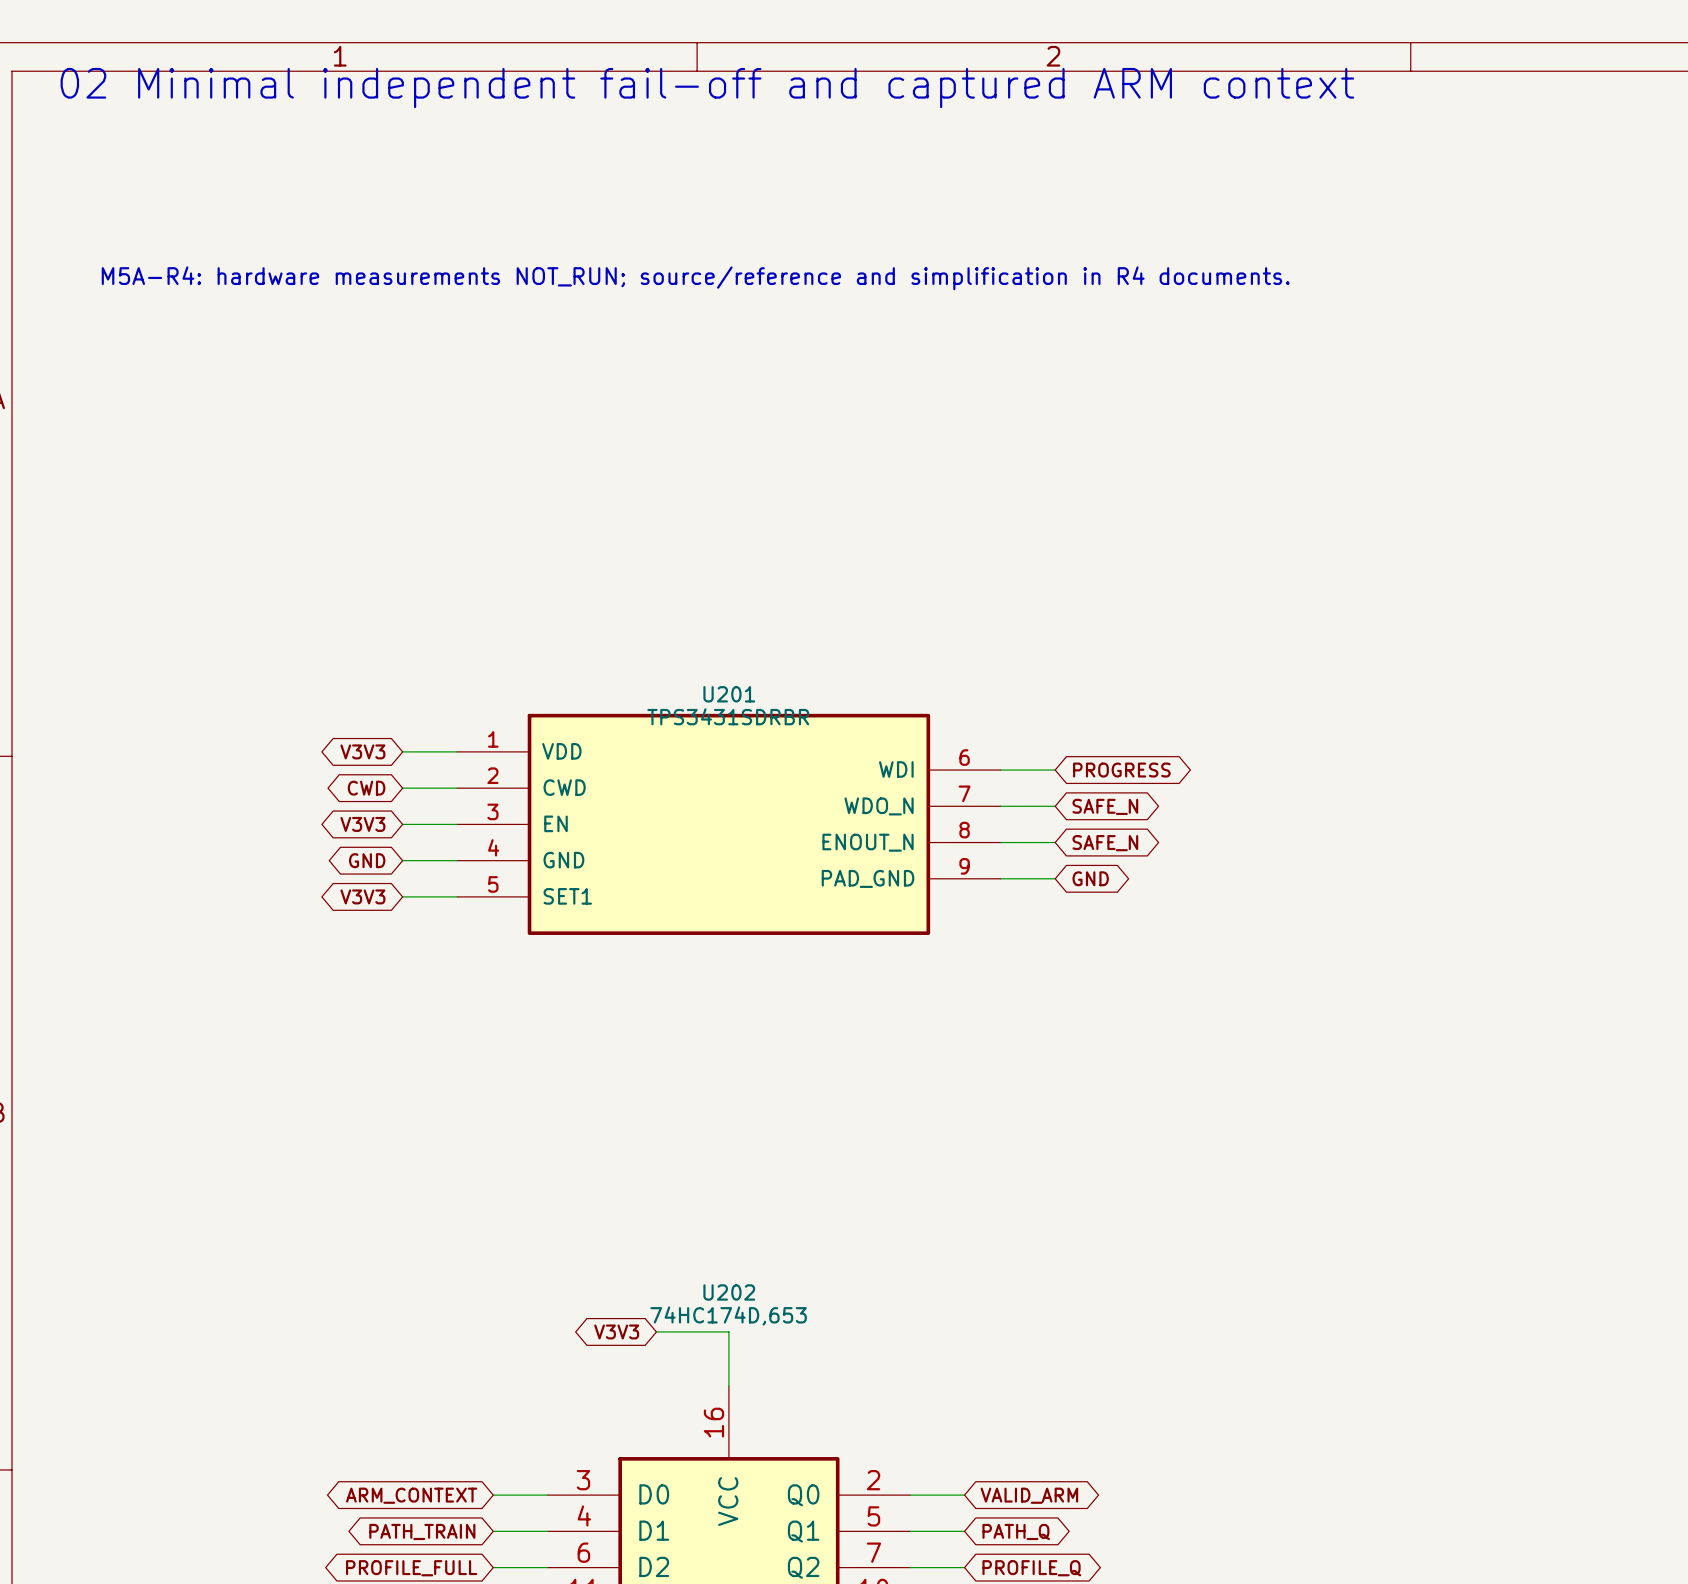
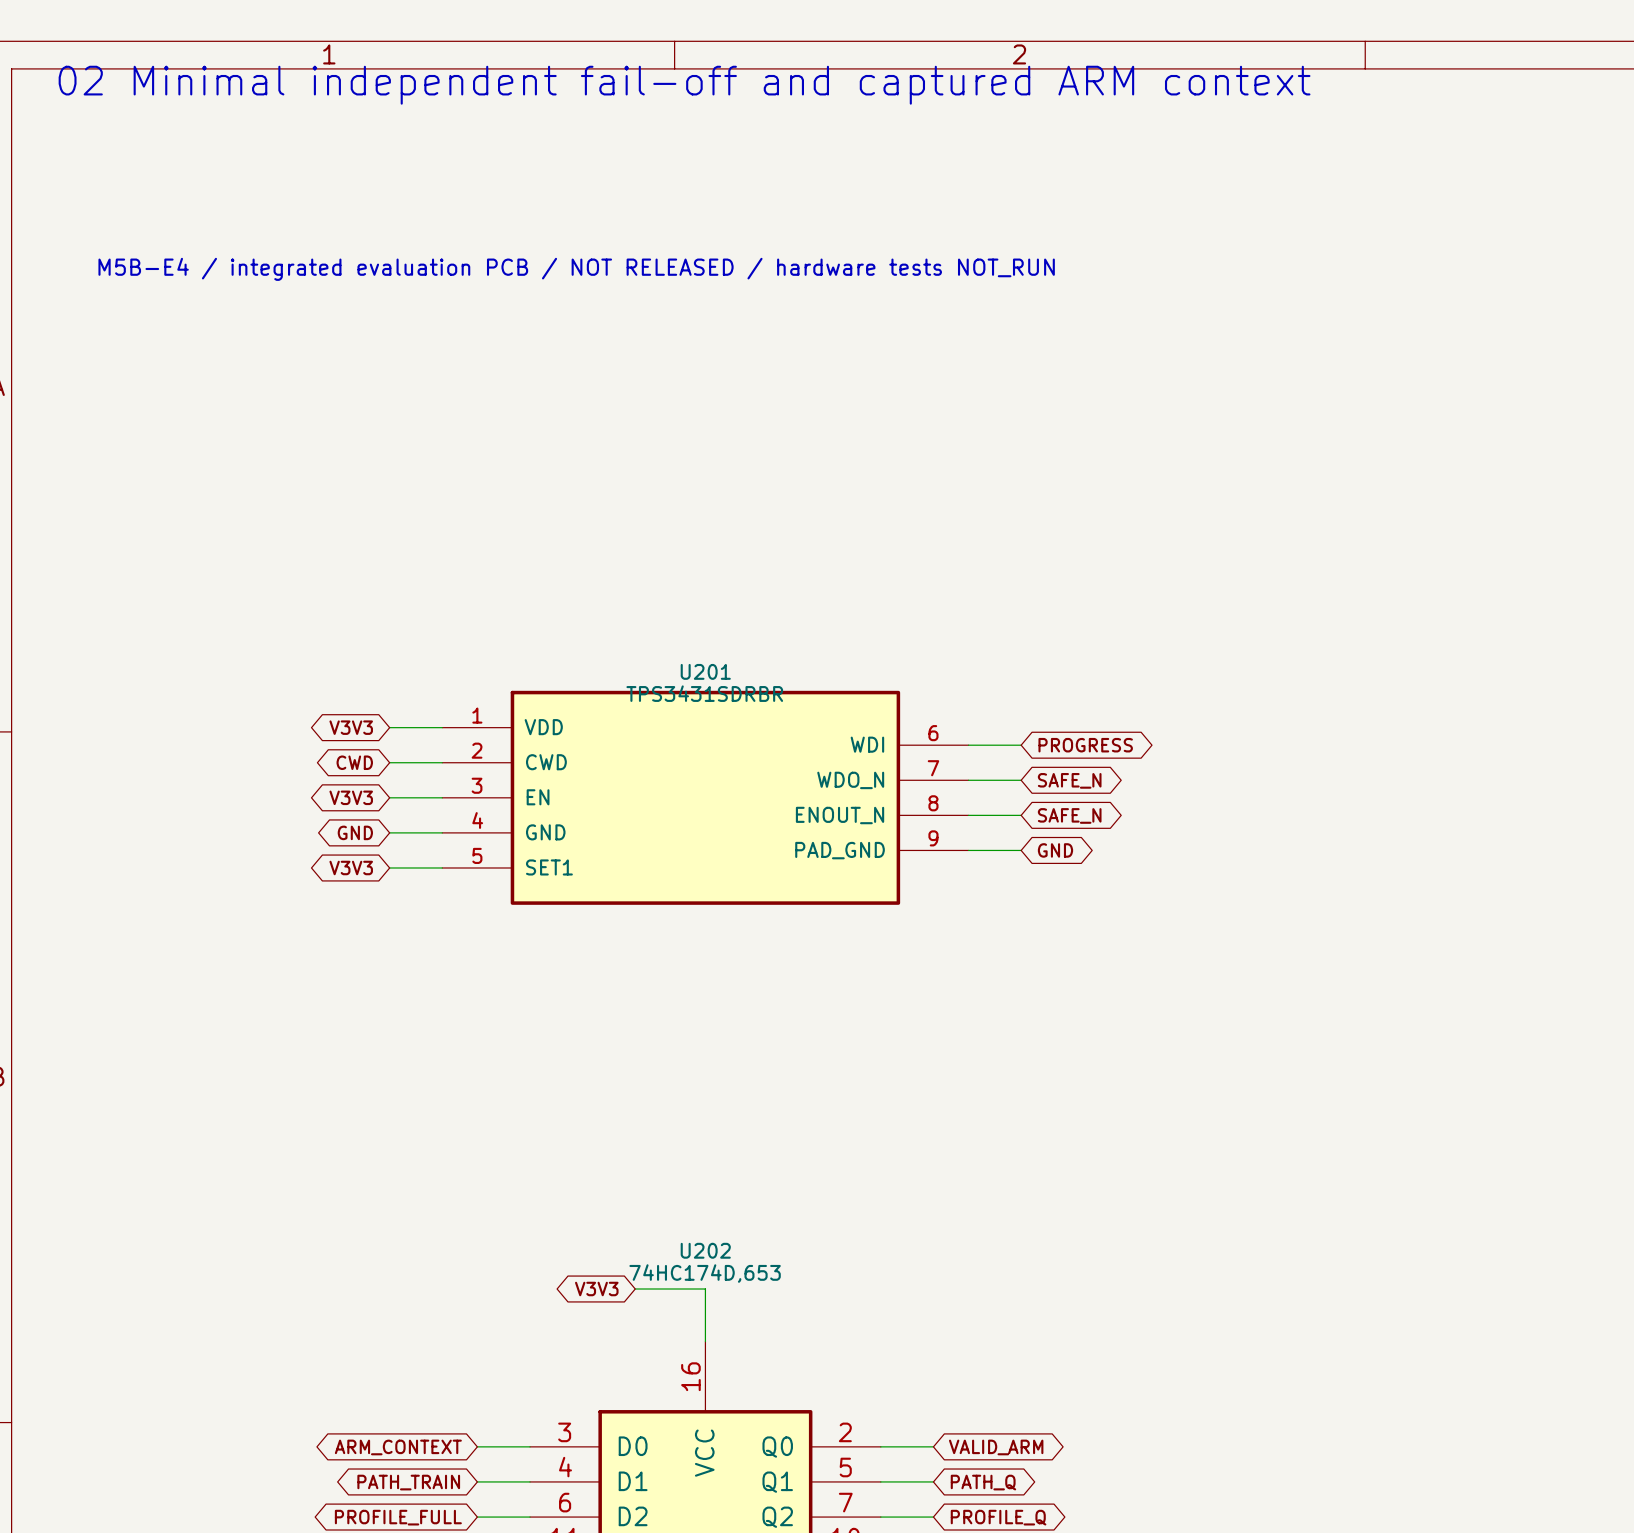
text: M5A-R4: hardware measurements NOT_RUN; source/reference and simplification in R4 documents. (695, 278) -> M5B-E4 / integrated evaluation PCB / NOT RELEASED / hardware tests NOT_RUN (576, 269)

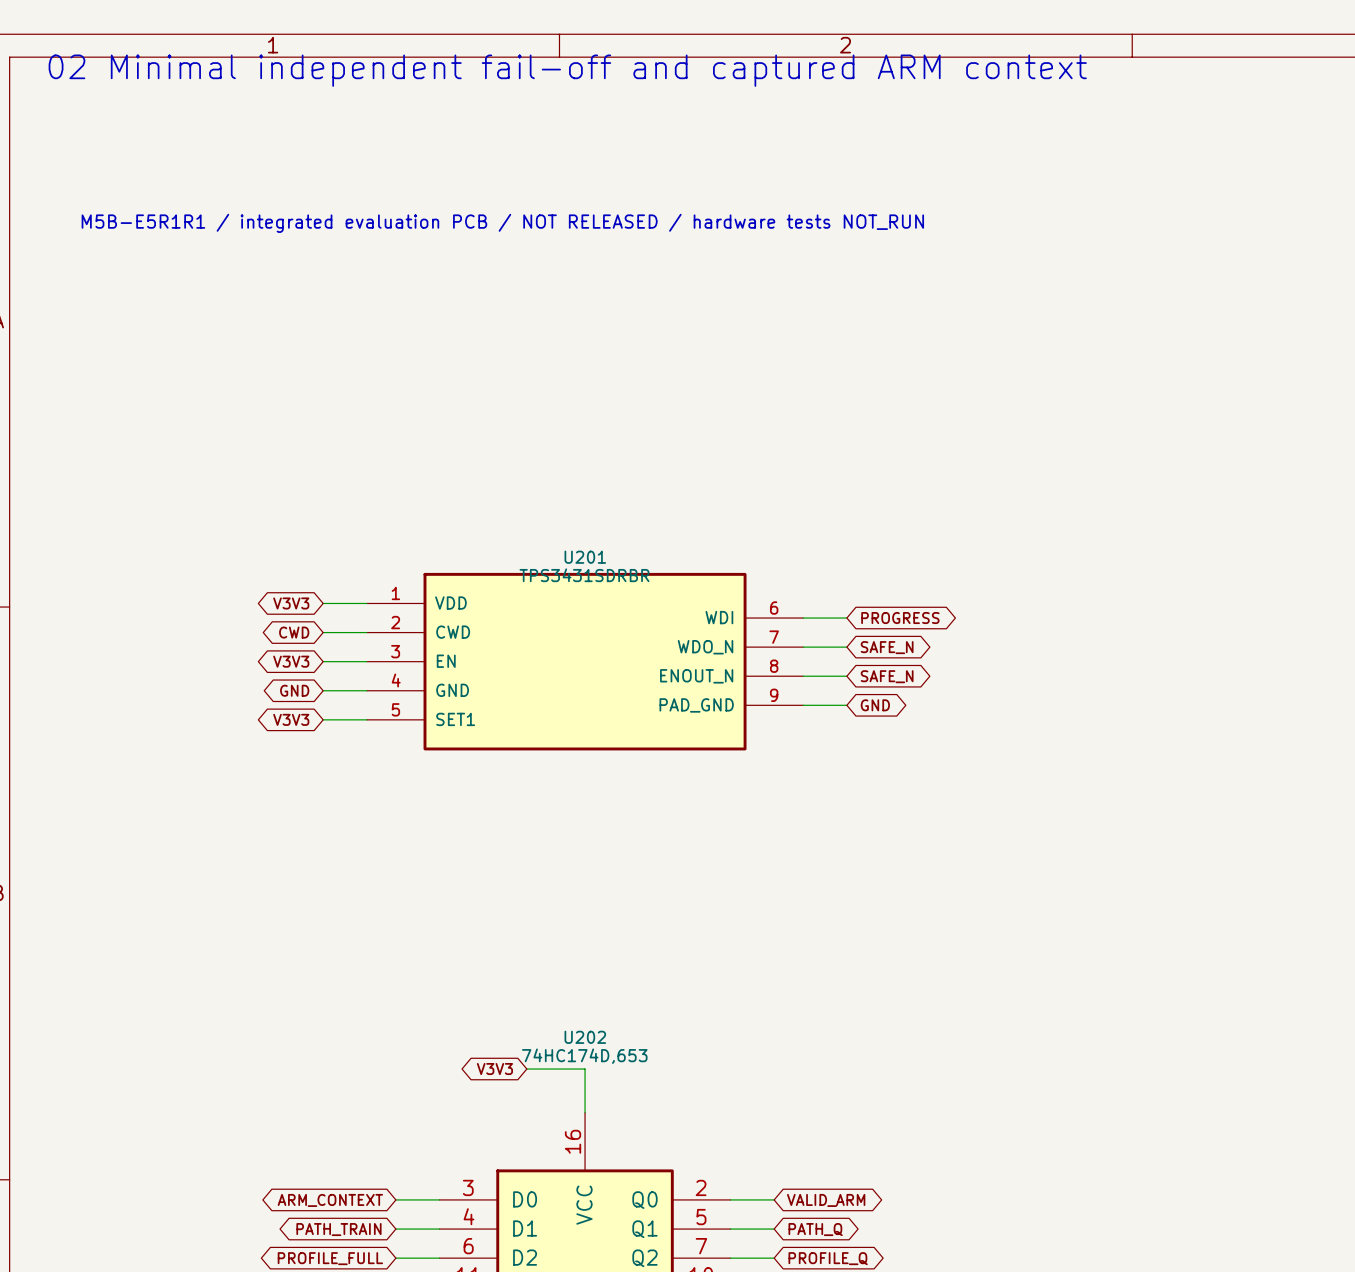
text: M5B-E4 / integrated evaluation PCB / NOT RELEASED / hardware tests NOT_RUN (576, 269) -> M5B-E5R1R1 / integrated evaluation PCB / NOT RELEASED / hardware tests NOT_RUN (502, 223)

